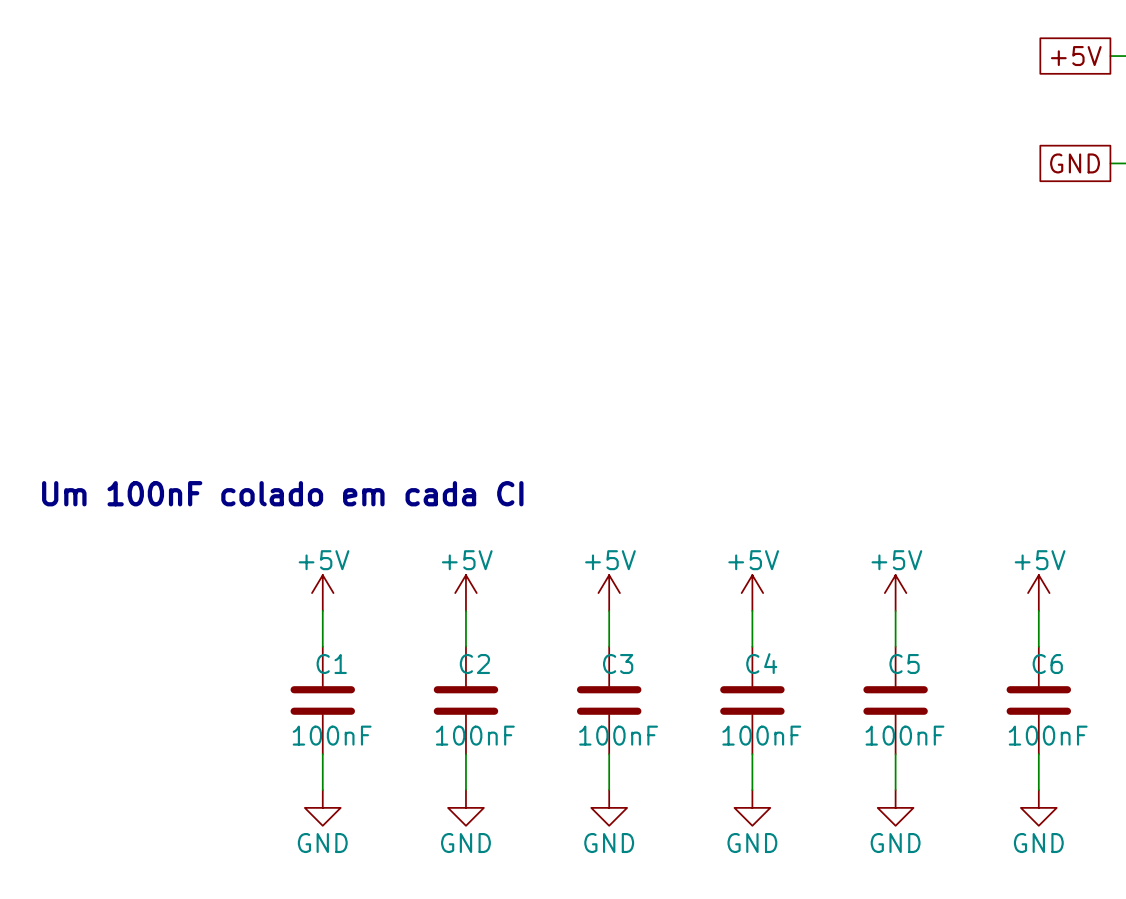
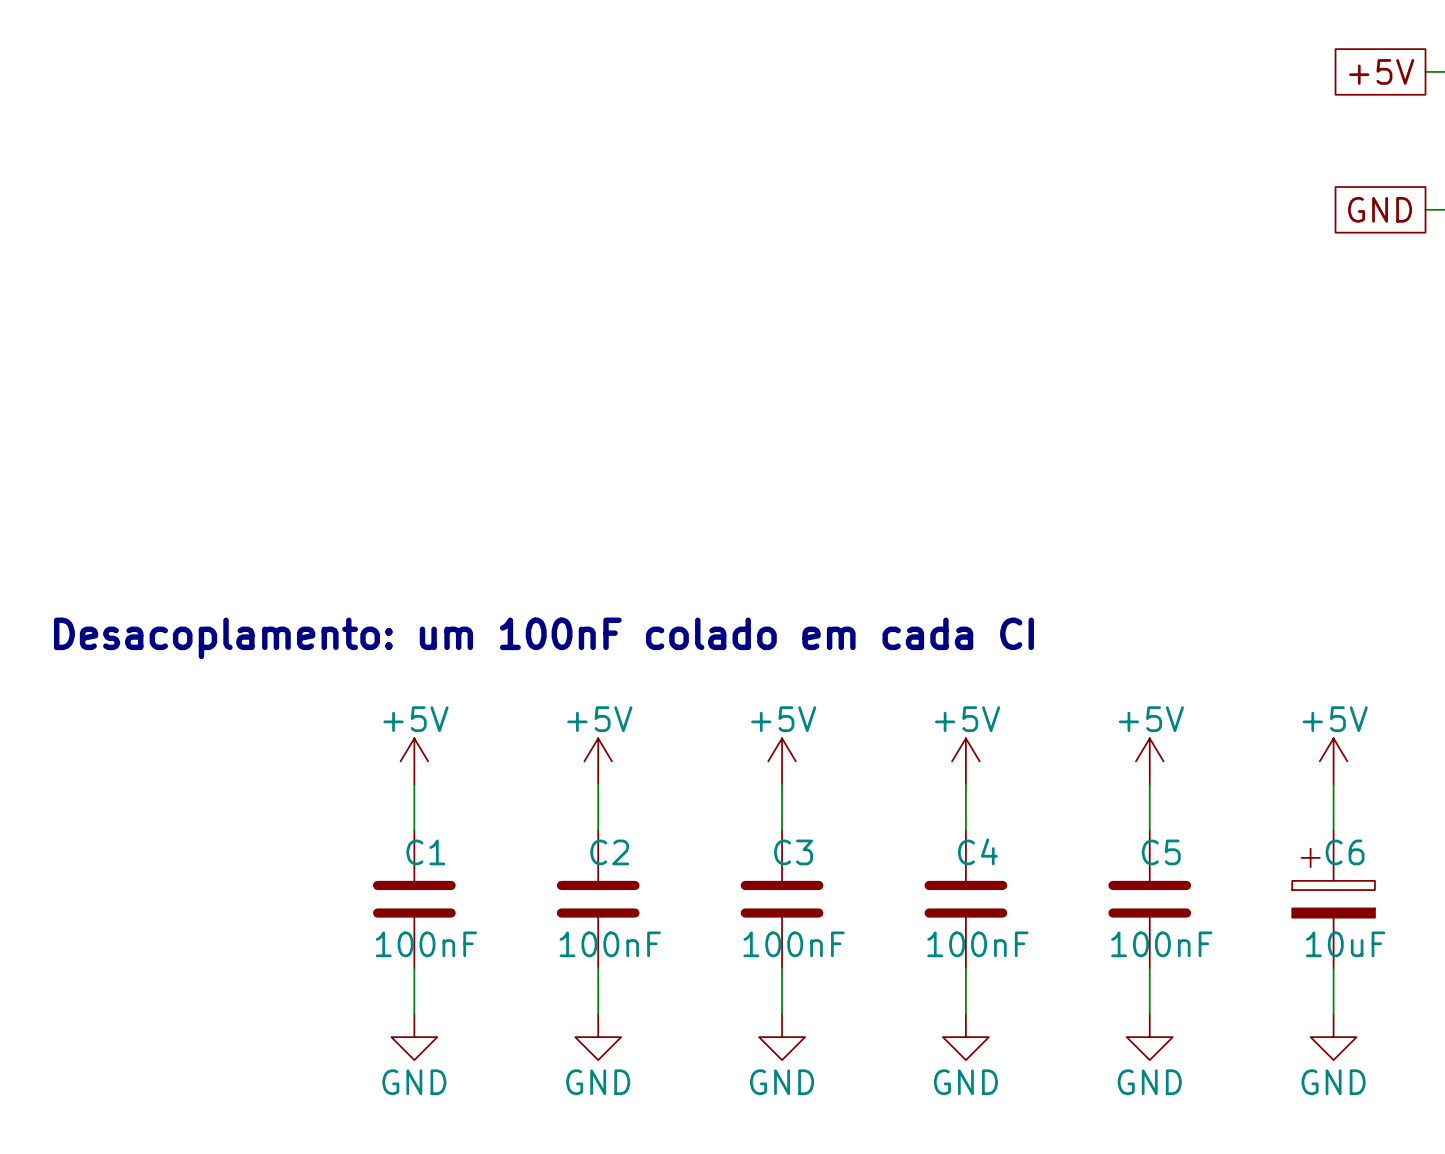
text: Um 100nF colado em cada CI (282, 493) -> Desacoplamento: um 100nF colado em cada CI (543, 638)
C6 symbol: [1006, 646, 1072, 755] -> [1292, 830, 1375, 969]
C6 value: 100nF (1048, 735) -> 10uF (1345, 944)

